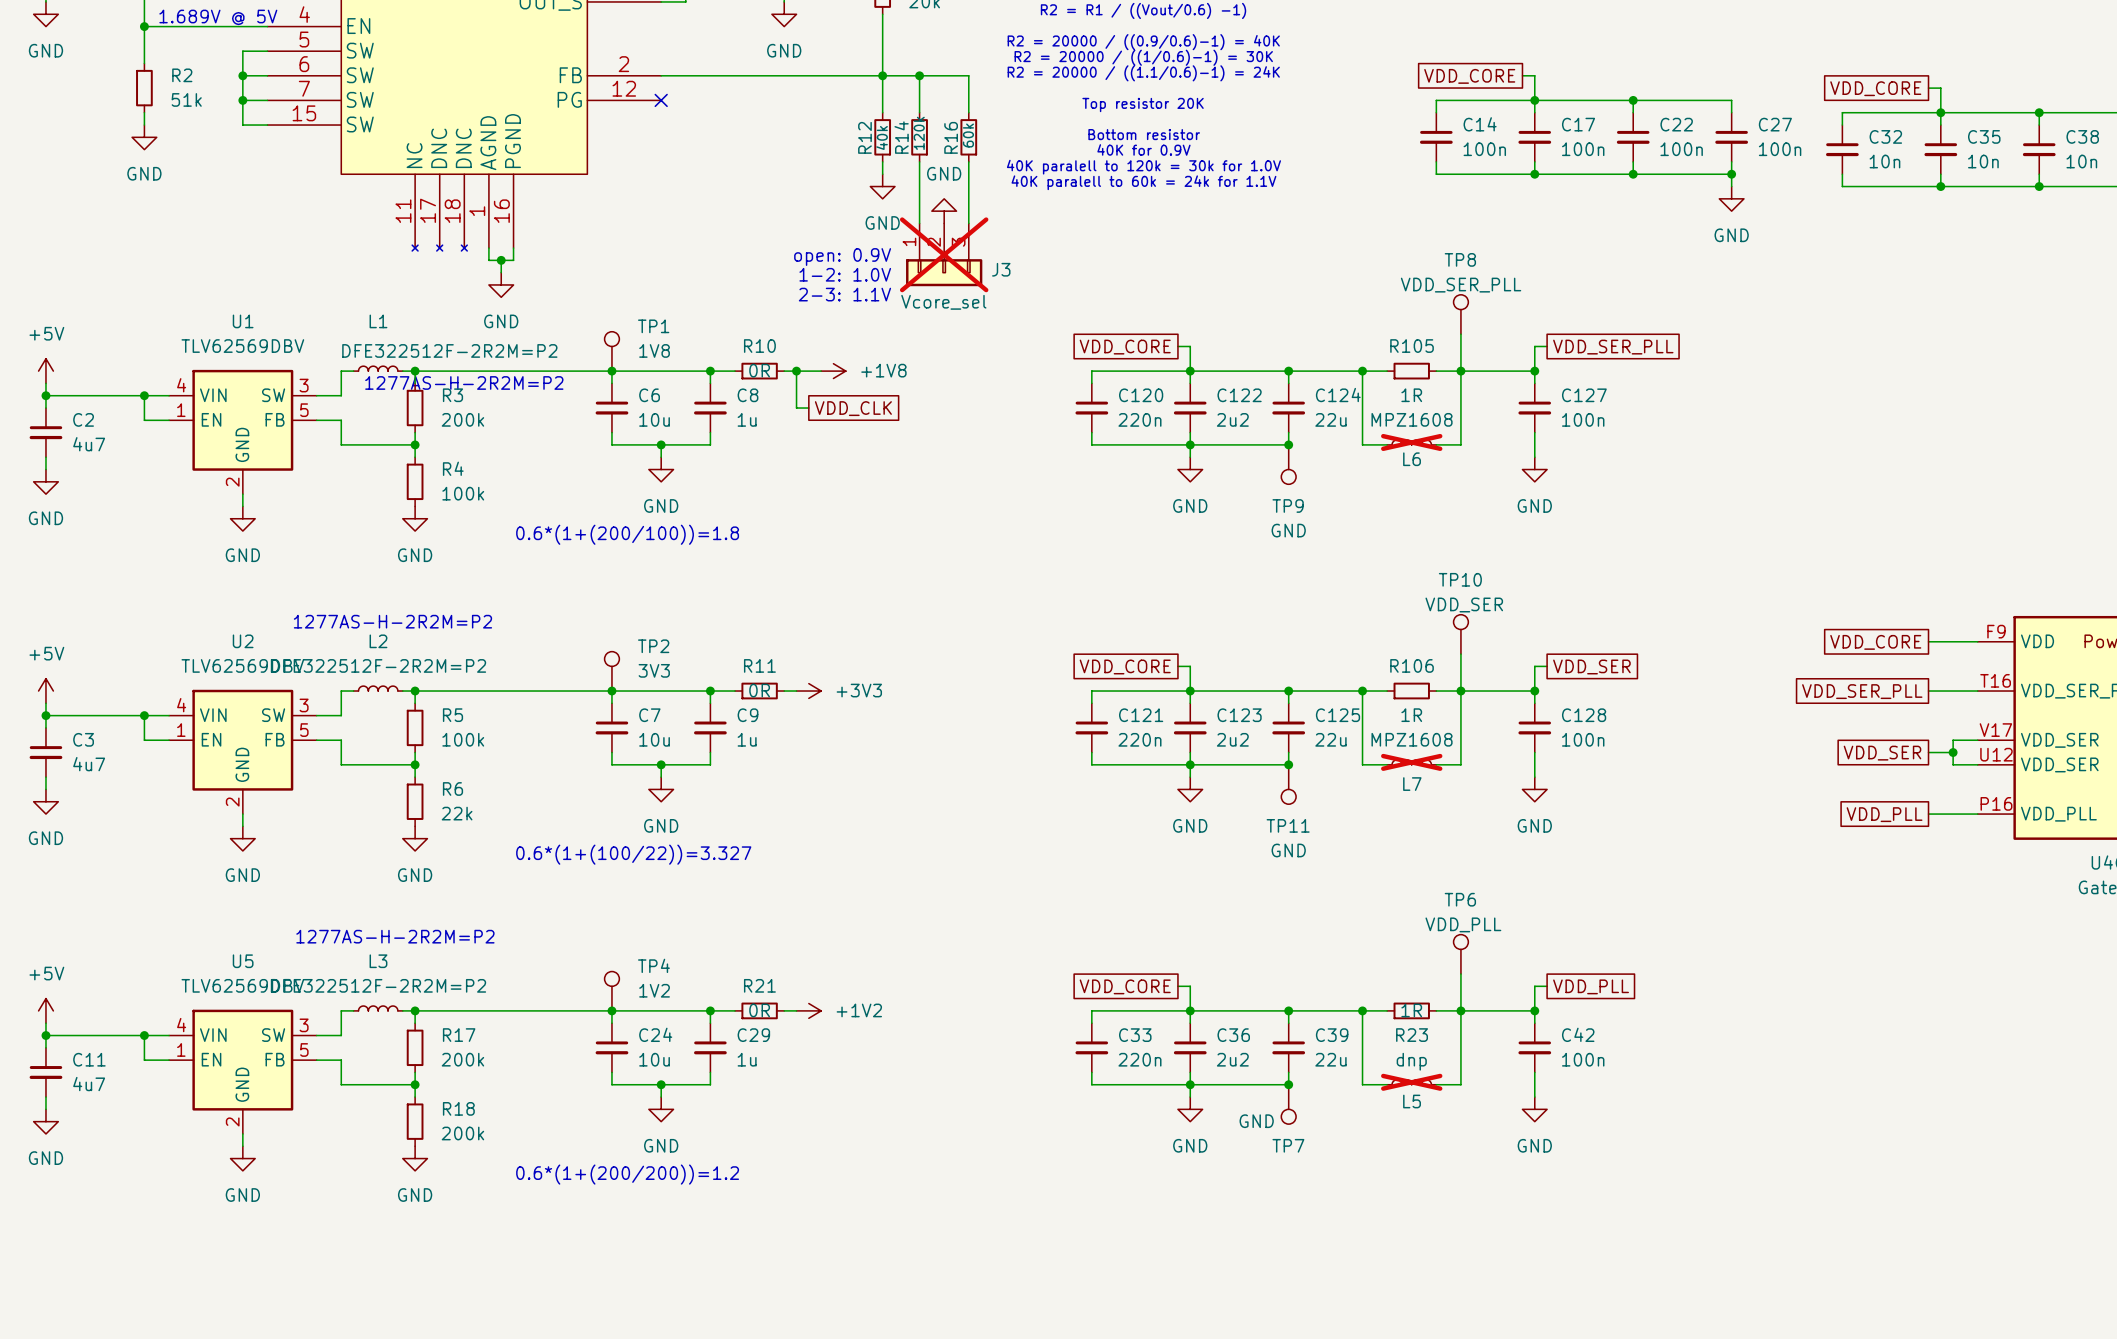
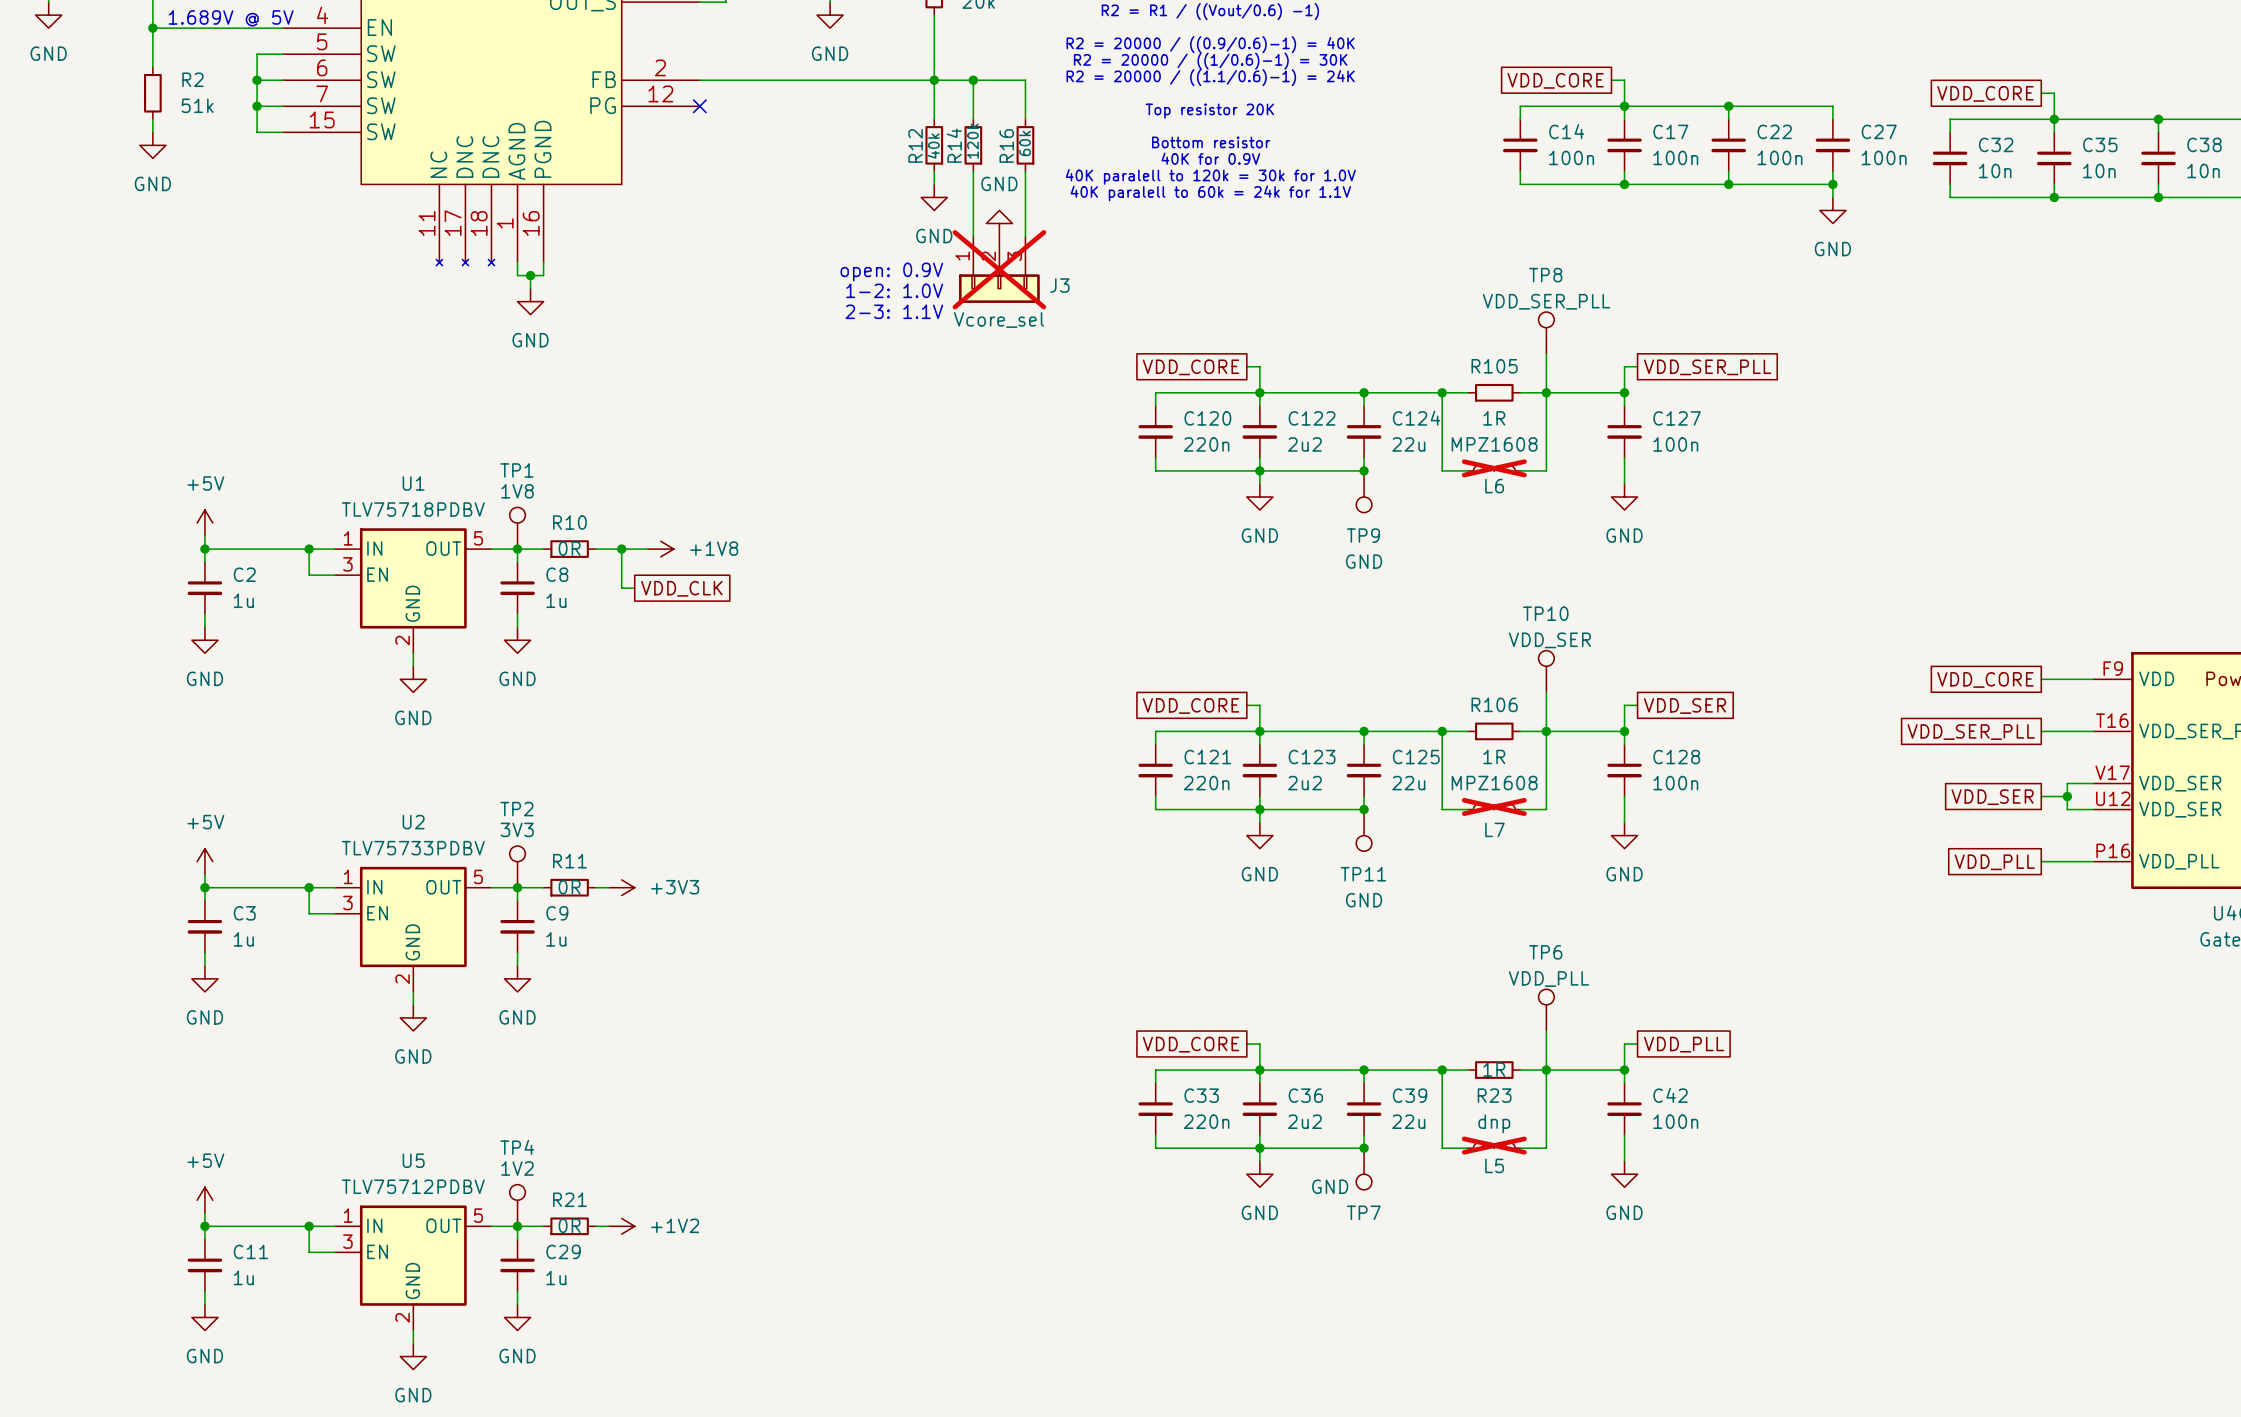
TP1 name position: TP1 (653, 326) -> TP1 (516, 470)
U1 value: TLV62569DBV (242, 346) -> TLV75718PDBV (413, 509)
TP1 value position: 1V8 (654, 350) -> 1V8 (517, 491)
TP1 position: (611, 351) -> (517, 528)
L1: DFE322512F-2R2M=P2 (378, 368) -> none
U1 symbol: [169, 369, 317, 495] -> [335, 528, 492, 654]
power symbol: +5V (45, 371) -> none
wire: (353, 371) (341, 371) (341, 395) (316, 395) -> none
wire: (402, 371) (735, 371) -> none
wire: (415, 371) (415, 383) -> (517, 549) (517, 562)
junction: (415, 371) -> none
wire: (611, 371) (611, 383) -> none
junction: (611, 371) -> none
wire: (710, 371) (710, 383) -> none
junction: (710, 371) -> none
R10 position: (759, 371) -> (569, 549)
wire: (784, 371) (821, 371) -> none
wire: (796, 371) (796, 408) (808, 408) -> none
junction: (796, 371) -> none
power symbol: +1V8 (833, 371) -> none
text: 1277AS-H-2R2M=P2 (464, 382) -> none
wire: (45, 383) (45, 408) -> (204, 536) (204, 562)
wire: (45, 395) (169, 395) -> (204, 549) (335, 549)
junction: (45, 395) -> none
wire: (144, 395) (144, 420) (169, 420) -> (309, 549) (309, 575) (335, 575)
junction: (144, 395) -> none
R3: 200k (415, 408) -> none
C6: 10u (611, 408) -> none
C8 position: (710, 408) -> (517, 588)
global label: VDD_CLK (853, 408) -> none
wire: (316, 420) (341, 420) (341, 444) (415, 444) -> none
C2 position: (45, 432) -> (204, 588)
wire: (415, 432) (415, 457) -> none
wire: (611, 432) (611, 444) (710, 444) (710, 432) -> none
C2 value: 4u7 (89, 444) -> 1u (243, 600)
junction: (415, 444) -> none
wire: (661, 444) (661, 457) -> (517, 614) (517, 627)
junction: (661, 444) -> none
wire: (45, 457) (45, 469) -> (204, 614) (204, 627)
power symbol: GND (661, 469) -> none
power symbol: GND (45, 481) -> none
R4: 100k (415, 481) -> none
power symbol: none -> +5V (204, 523)
wire: (242, 494) (242, 506) -> (413, 653) (413, 666)
junction: none -> (204, 549)
power symbol: GND (242, 518) -> none
junction: none -> (309, 549)
power symbol: GND (415, 518) -> none
wire: none -> (491, 549) (543, 549)
junction: none -> (517, 549)
wire: none -> (595, 549) (647, 549)
wire: none -> (621, 549) (621, 588) (634, 588)
junction: none -> (621, 549)
power symbol: none -> +1V8 (660, 549)
text: 0.6*(1+(200/100))=1.8 (627, 534) -> none
global label: none -> VDD_CLK (681, 588)
power symbol: none -> GND (204, 640)
power symbol: none -> GND (517, 640)
text: 1277AS-H-2R2M=P2 (392, 621) -> none
power symbol: none -> GND (413, 679)
TP2 name position: TP2 (653, 646) -> TP2 (516, 809)
U2 value: TLV62569DBV (242, 665) -> TLV75733PDBV (413, 848)
TP2 value position: 3V3 (654, 670) -> 3V3 (517, 829)
TP2 position: (611, 671) -> (517, 866)
L2: DFE322512F-2R2M=P2 (378, 688) -> none
U2 symbol: [169, 689, 317, 815] -> [335, 866, 492, 992]
power symbol: +5V (45, 691) -> none
wire: (353, 691) (341, 691) (341, 715) (316, 715) -> none
wire: (402, 691) (735, 691) -> none
wire: (415, 691) (415, 703) -> (517, 887) (517, 900)
junction: (415, 691) -> none
wire: (611, 691) (611, 703) -> none
junction: (611, 691) -> none
wire: (710, 691) (710, 703) -> none
junction: (710, 691) -> none
R11 position: (759, 691) -> (569, 887)
wire: (784, 691) (796, 691) -> none
power symbol: +3V3 (808, 691) -> none
wire: (45, 703) (45, 727) -> (204, 874) (204, 900)
wire: (45, 715) (169, 715) -> (204, 887) (335, 887)
junction: (45, 715) -> none
wire: (144, 715) (144, 740) (169, 740) -> (309, 887) (309, 913) (335, 913)
junction: (144, 715) -> none
R5: 100k (415, 727) -> none
C7: 10u (611, 727) -> none
C9 position: (710, 727) -> (517, 926)
wire: (316, 740) (341, 740) (341, 764) (415, 764) -> none
C3 position: (45, 752) -> (204, 926)
wire: (415, 752) (415, 777) -> none
wire: (611, 752) (611, 764) (710, 764) (710, 752) -> none
C3 value: 4u7 (89, 764) -> 1u (243, 939)
junction: (415, 764) -> none
wire: (661, 764) (661, 777) -> (517, 952) (517, 965)
junction: (661, 764) -> none
wire: (45, 777) (45, 789) -> (204, 952) (204, 965)
power symbol: GND (661, 789) -> none
power symbol: GND (45, 801) -> none
R6: 22k (415, 801) -> none
power symbol: none -> +5V (204, 861)
wire: (242, 814) (242, 826) -> (413, 991) (413, 1004)
junction: none -> (204, 887)
power symbol: GND (242, 838) -> none
junction: none -> (309, 887)
power symbol: GND (415, 838) -> none
wire: none -> (491, 887) (543, 887)
junction: none -> (517, 887)
wire: none -> (595, 887) (608, 887)
power symbol: none -> +3V3 (621, 887)
text: 0.6*(1+(100/22))=3.327 (633, 854) -> none
power symbol: none -> GND (204, 978)
power symbol: none -> GND (517, 978)
text: 1277AS-H-2R2M=P2 (395, 936) -> none
power symbol: none -> GND (413, 1017)
TP4 name position: TP4 (653, 965) -> TP4 (517, 1147)
U5 value: TLV62569DBV (242, 985) -> TLV75712PDBV (413, 1186)
TP4 value position: 1V2 (654, 990) -> 1V2 (517, 1168)
TP4 position: (611, 991) -> (517, 1205)
L3: DFE322512F-2R2M=P2 (378, 1008) -> none
U5 symbol: [169, 1009, 317, 1134] -> [335, 1205, 492, 1331]
power symbol: +5V (45, 1010) -> none
wire: (353, 1010) (341, 1010) (341, 1035) (316, 1035) -> none
wire: (402, 1010) (735, 1010) -> none
wire: (415, 1010) (415, 1023) -> (517, 1226) (517, 1239)
junction: (415, 1010) -> none
wire: (611, 1010) (611, 1023) -> none
junction: (611, 1010) -> none
wire: (710, 1010) (710, 1023) -> none
junction: (710, 1010) -> none
R21 position: (759, 1010) -> (569, 1226)
wire: (784, 1010) (796, 1010) -> none
power symbol: +1V2 (808, 1010) -> none
wire: (45, 1023) (45, 1047) -> (204, 1213) (204, 1239)
wire: (45, 1035) (169, 1035) -> (204, 1226) (335, 1226)
junction: (45, 1035) -> none
wire: (144, 1035) (144, 1060) (169, 1060) -> (309, 1226) (309, 1252) (335, 1252)
junction: (144, 1035) -> none
R17: 200k (415, 1047) -> none
C24: 10u (611, 1047) -> none
C29 position: (710, 1047) -> (517, 1265)
wire: (316, 1060) (341, 1060) (341, 1084) (415, 1084) -> none
C11 position: (45, 1072) -> (204, 1265)
wire: (415, 1072) (415, 1097) -> none
wire: (611, 1072) (611, 1084) (710, 1084) (710, 1072) -> none
C11 value: 4u7 (89, 1084) -> 1u (243, 1277)
junction: (415, 1084) -> none
wire: (661, 1084) (661, 1097) -> (517, 1291) (517, 1304)
junction: (661, 1084) -> none
wire: (45, 1097) (45, 1109) -> (204, 1291) (204, 1304)
power symbol: GND (661, 1109) -> none
power symbol: GND (45, 1121) -> none
R18: 200k (415, 1121) -> none
power symbol: none -> +5V (204, 1200)
wire: (242, 1133) (242, 1146) -> (413, 1330) (413, 1343)
junction: none -> (204, 1226)
power symbol: GND (242, 1158) -> none
junction: none -> (309, 1226)
power symbol: GND (415, 1158) -> none
wire: none -> (491, 1226) (543, 1226)
junction: none -> (517, 1226)
wire: none -> (595, 1226) (608, 1226)
power symbol: none -> +1V2 (621, 1226)
text: 0.6*(1+(200/200))=1.2 (627, 1174) -> none
power symbol: none -> GND (204, 1317)
power symbol: none -> GND (517, 1317)
power symbol: none -> GND (413, 1356)

